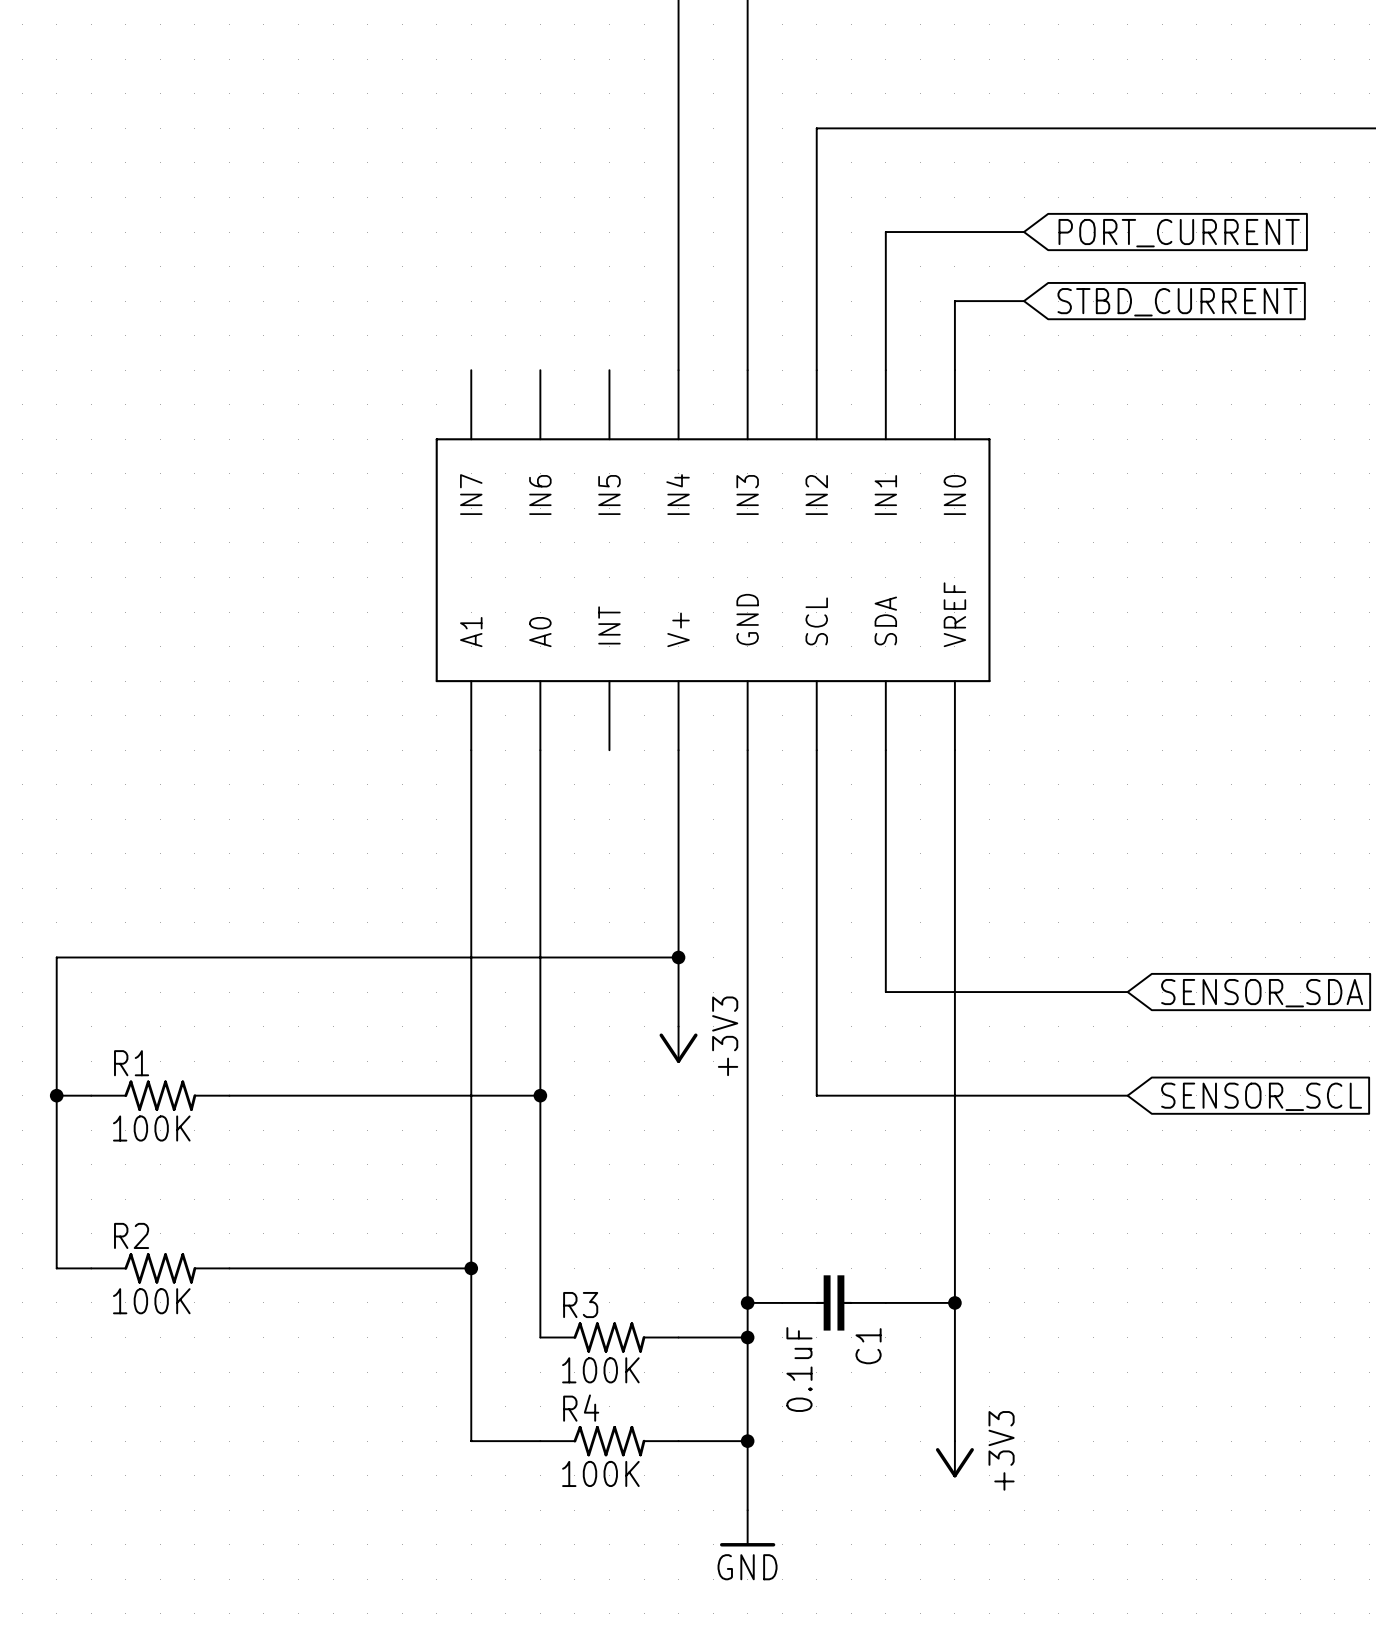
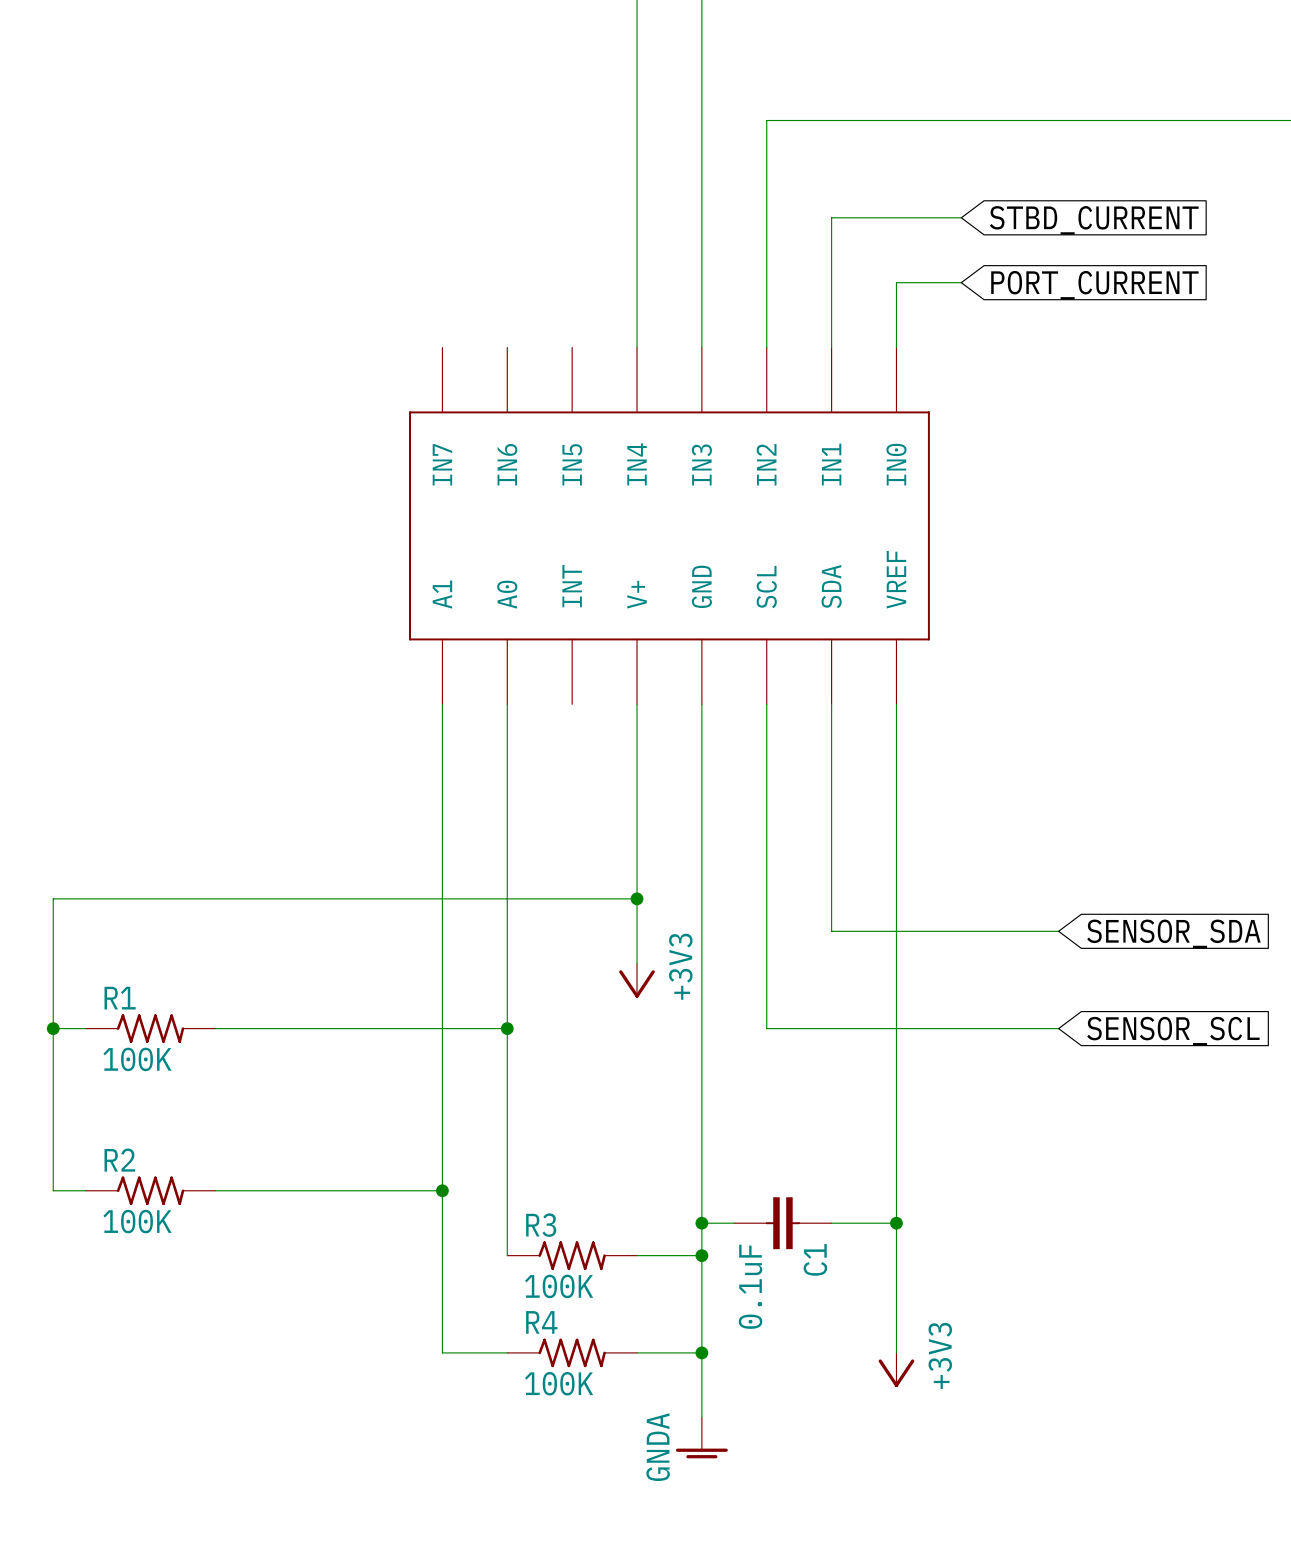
global label: PORT_CURRENT (1179, 233) -> STBD_CURRENT (1094, 220)
global label: STBD_CURRENT (1177, 302) -> PORT_CURRENT (1094, 285)
power symbol: GND (747, 1528) -> GNDA (701, 1438)

